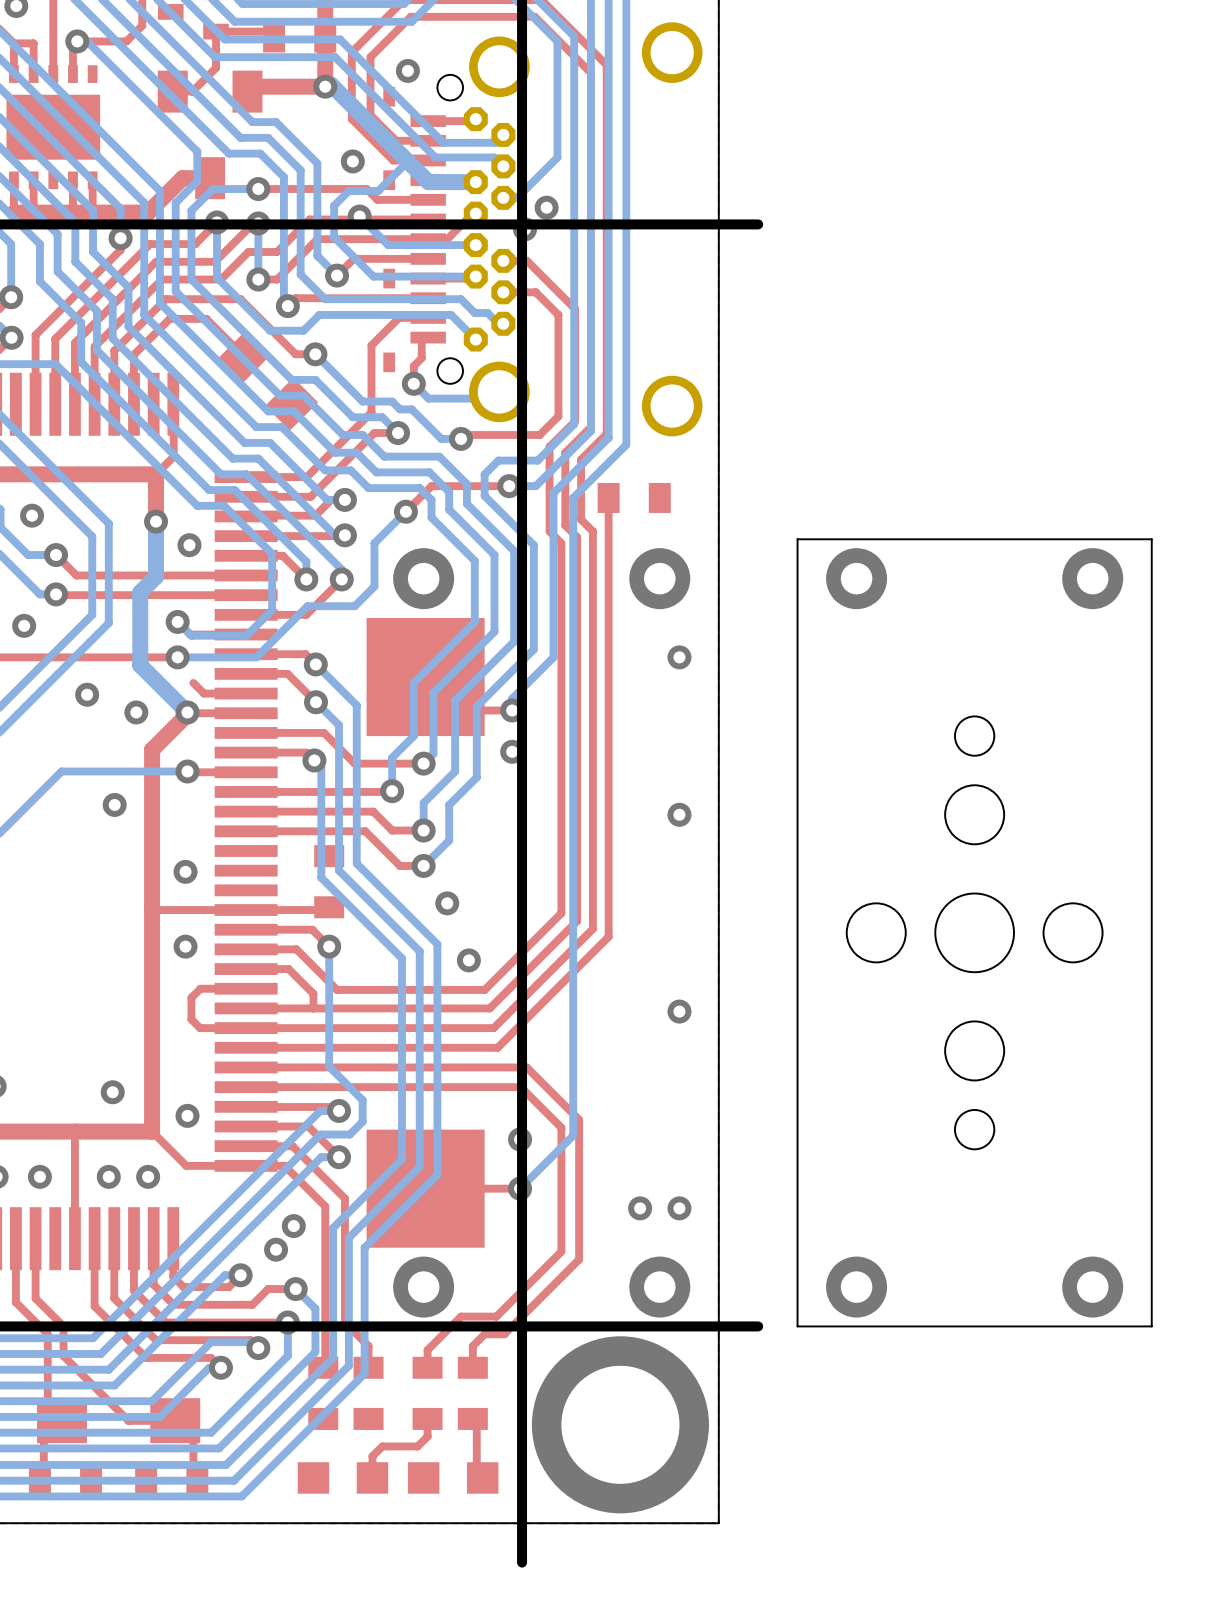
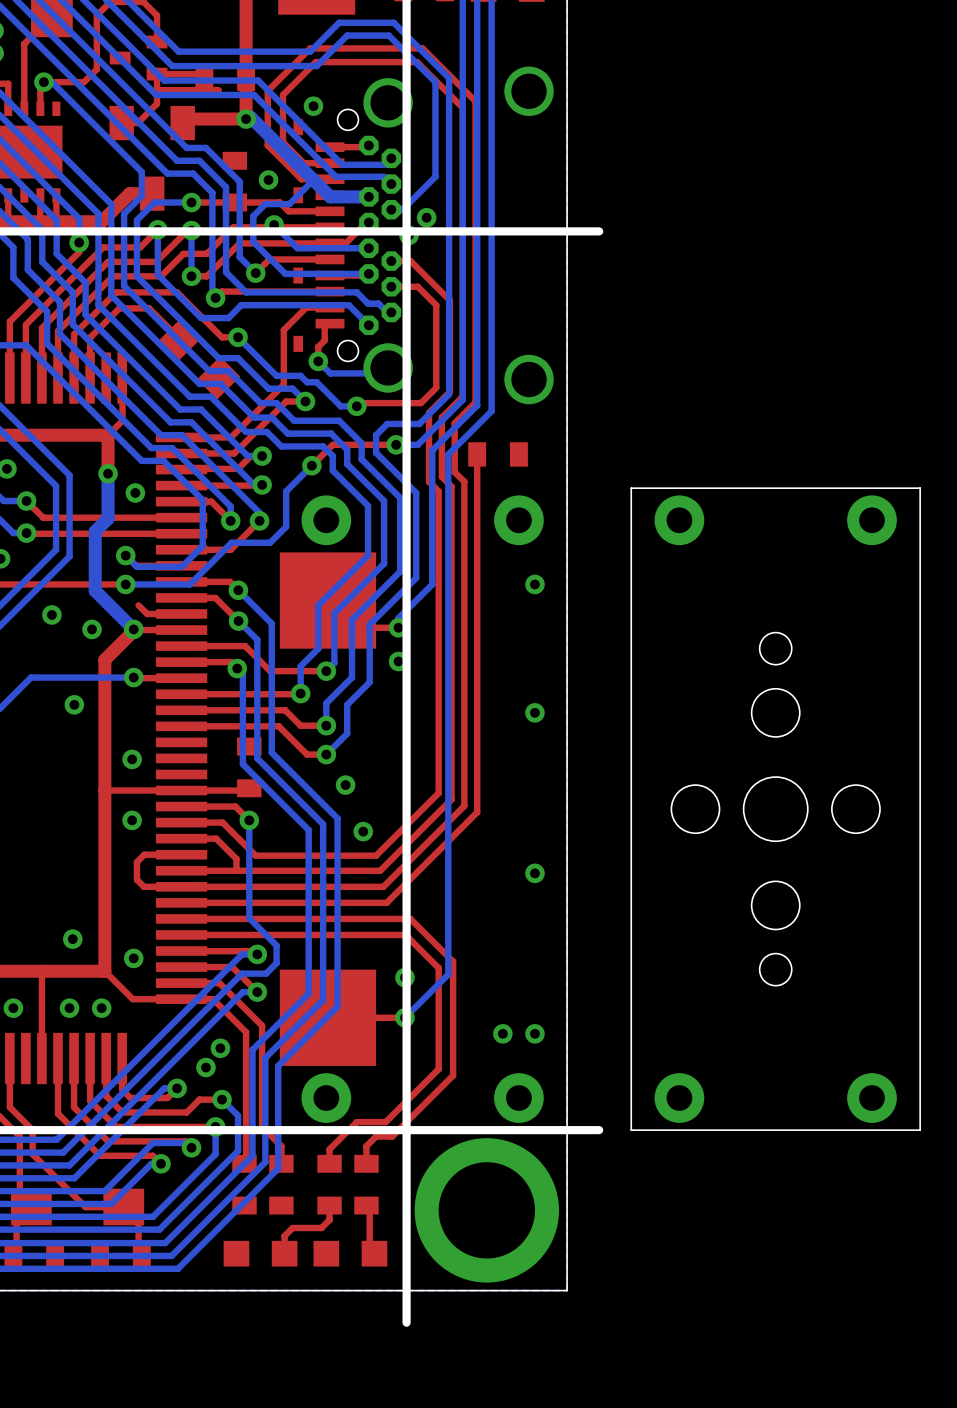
top track: none -> (218, 90) (157, 90)
part: none -> (234, 181)

